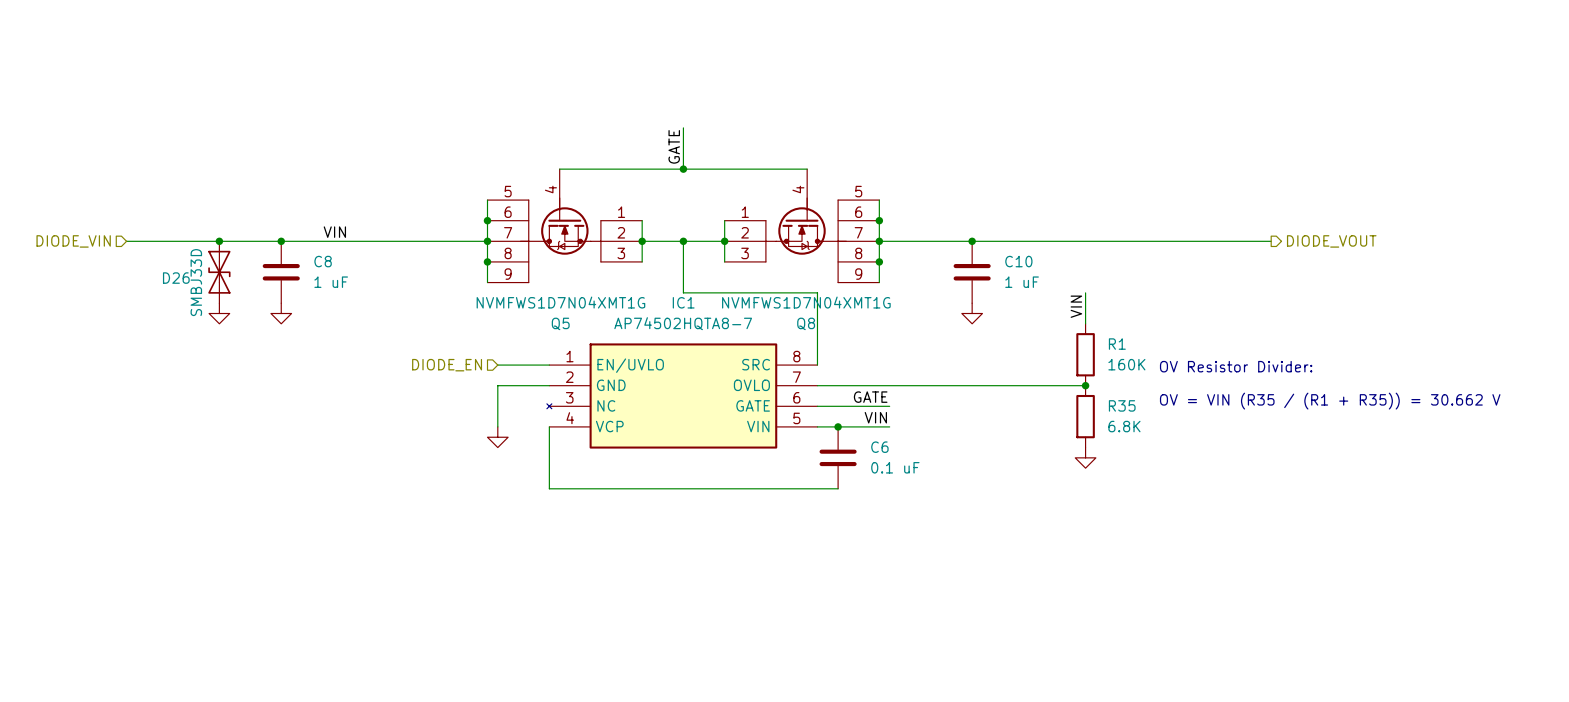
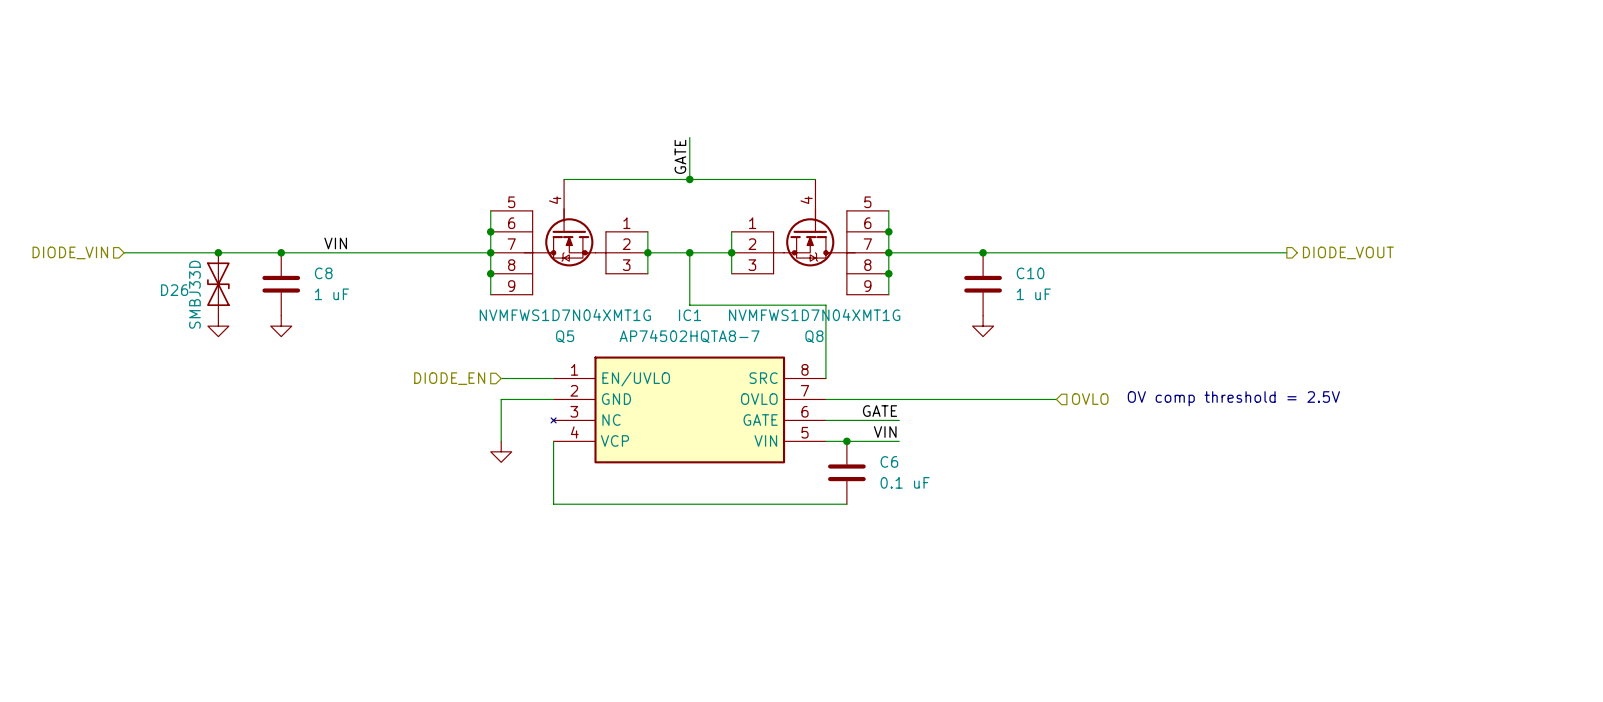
wire: (1085, 292) (1085, 323) -> none
label: VIN (1076, 306) -> none
R1: 160K (1085, 354) -> none
text: OV Resistor Divider: (1236, 366) -> none
text: none -> OV comp threshold = 2.5V (1233, 398)
wire: (1044, 385) (1085, 385) -> none
hierarchical label: none -> OVLO (1090, 399)
junction: (1085, 385) -> none
text: OV = VIN (R35 / (R1 + R35)) = 30.662 V (1330, 401) -> none
R35: 6.8K (1085, 416) -> none
power symbol: (1085, 457) -> none

